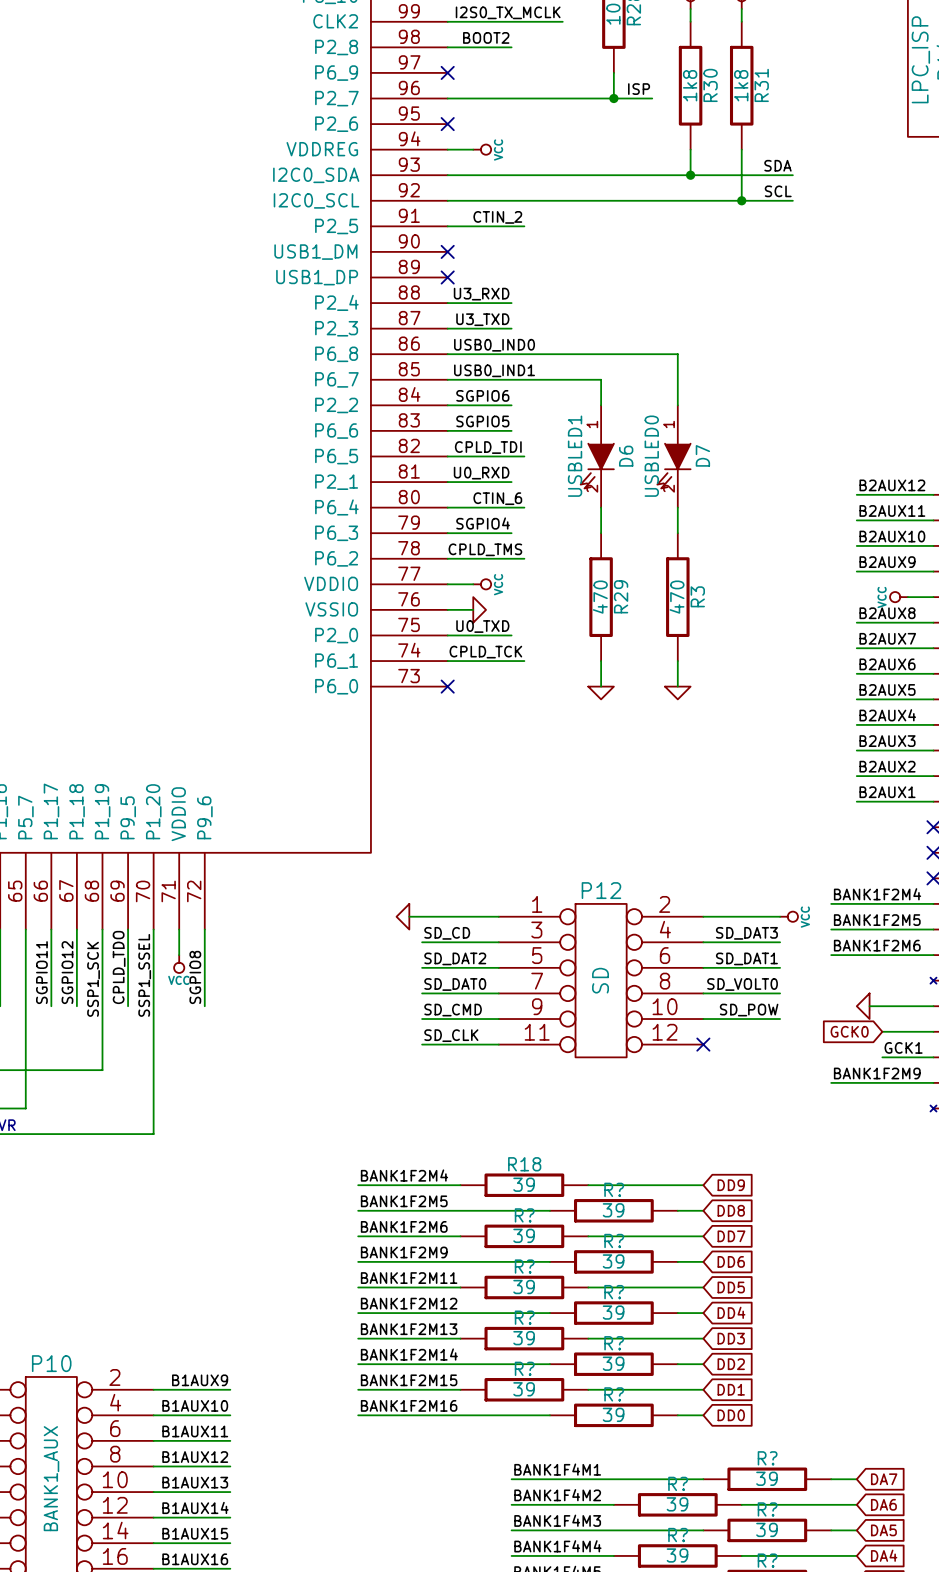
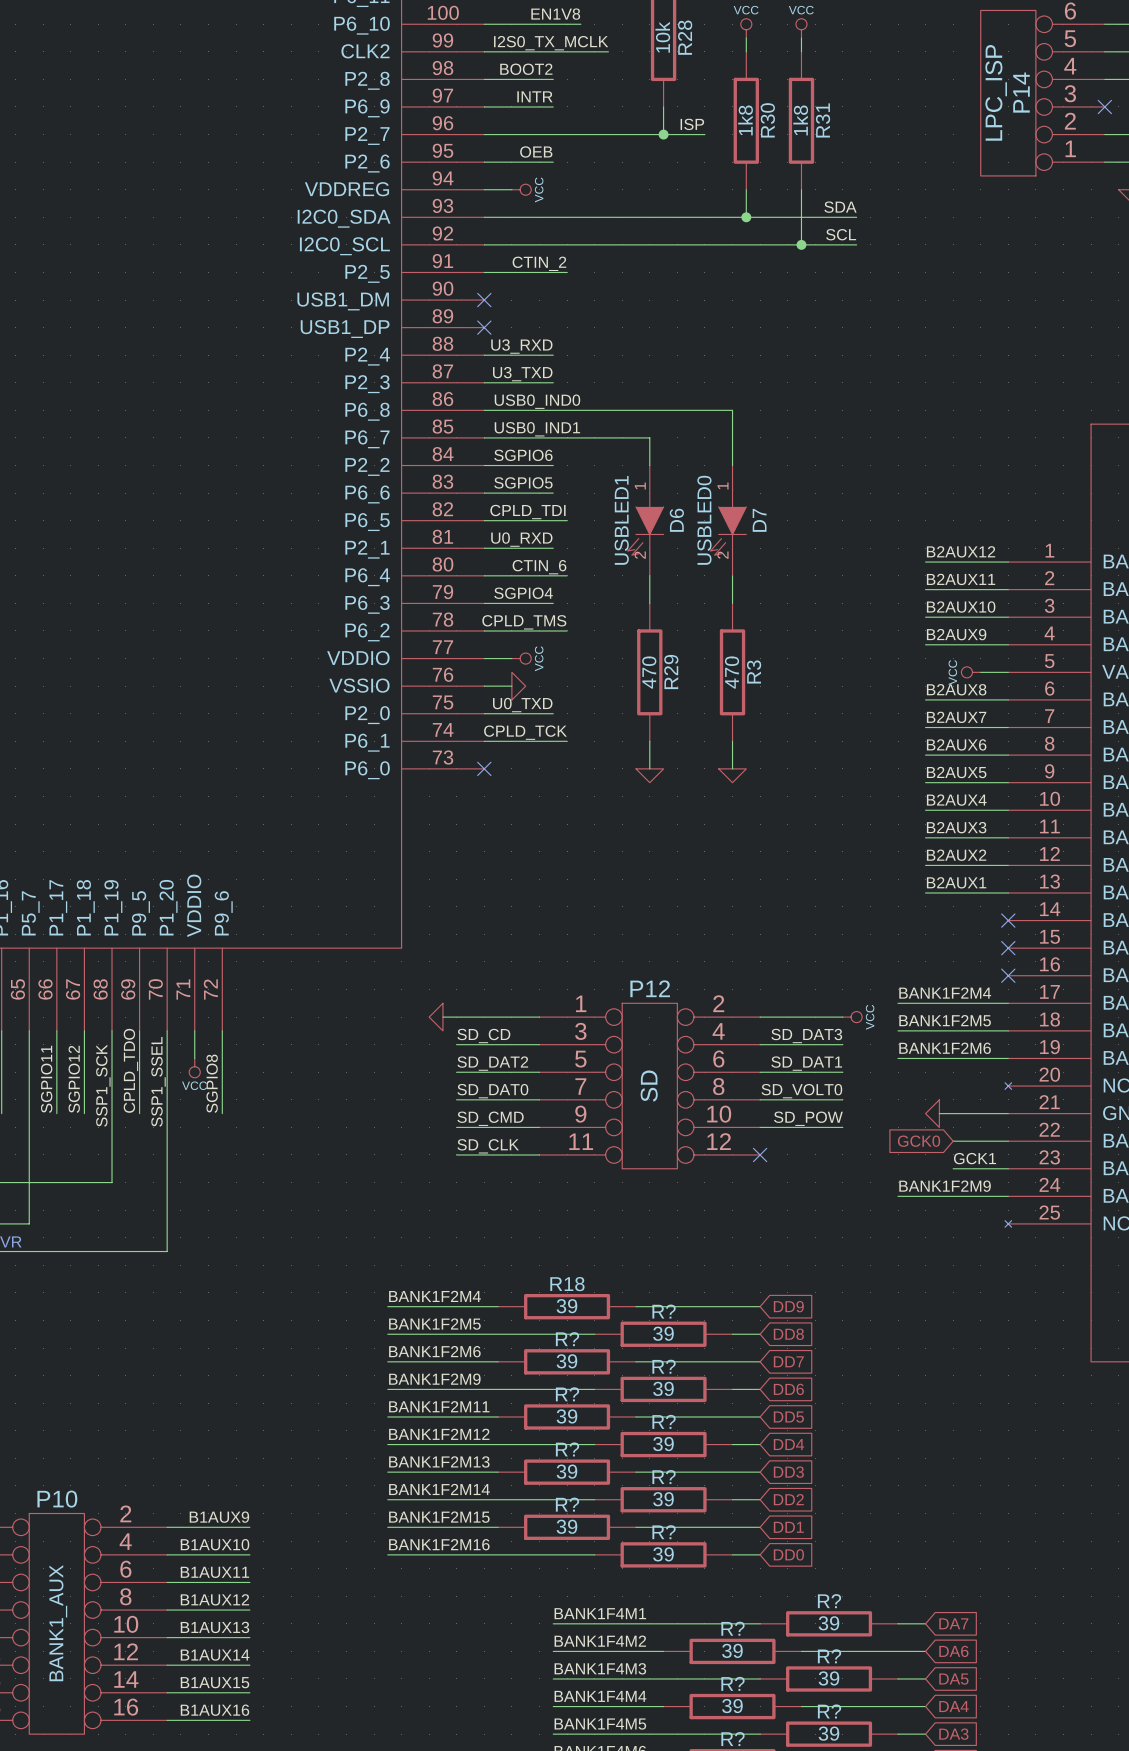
label: none -> INTR (534, 96)
wire: none -> (484, 106) (553, 106)
no-connect mark: (447, 72) -> none
label: none -> OEB (536, 151)
wire: none -> (484, 162) (553, 162)
no-connect mark: (447, 124) -> none

